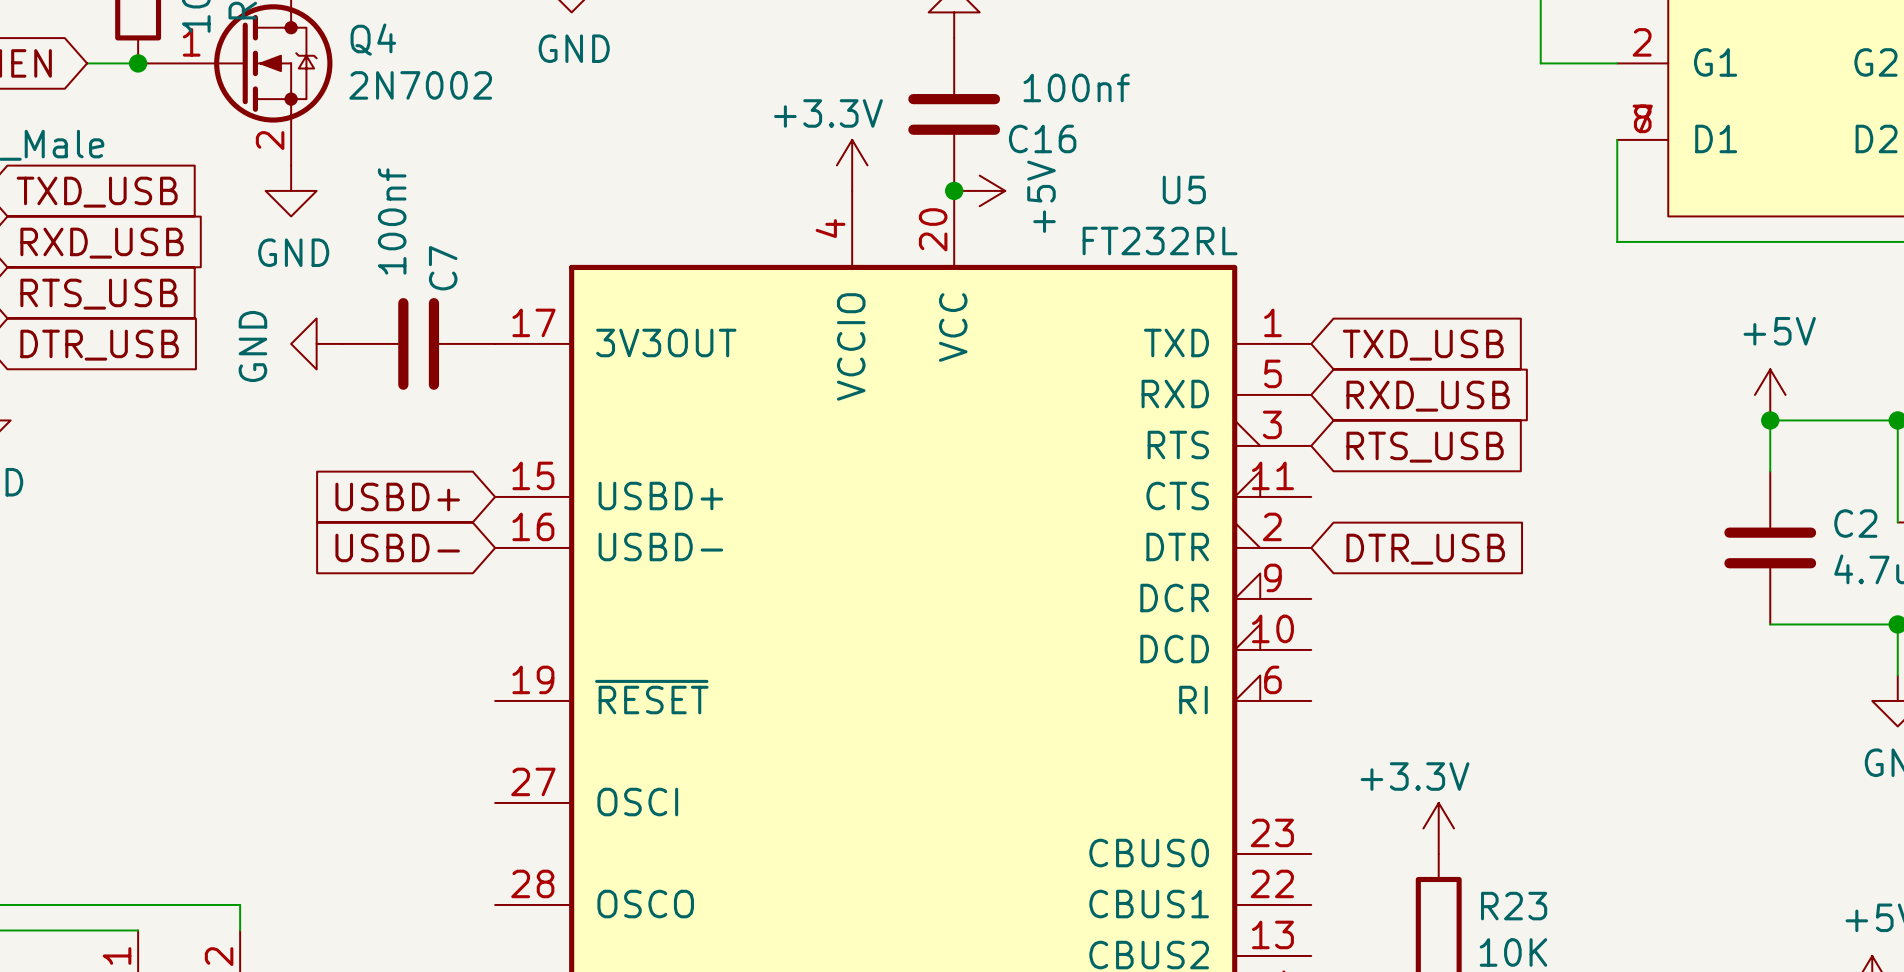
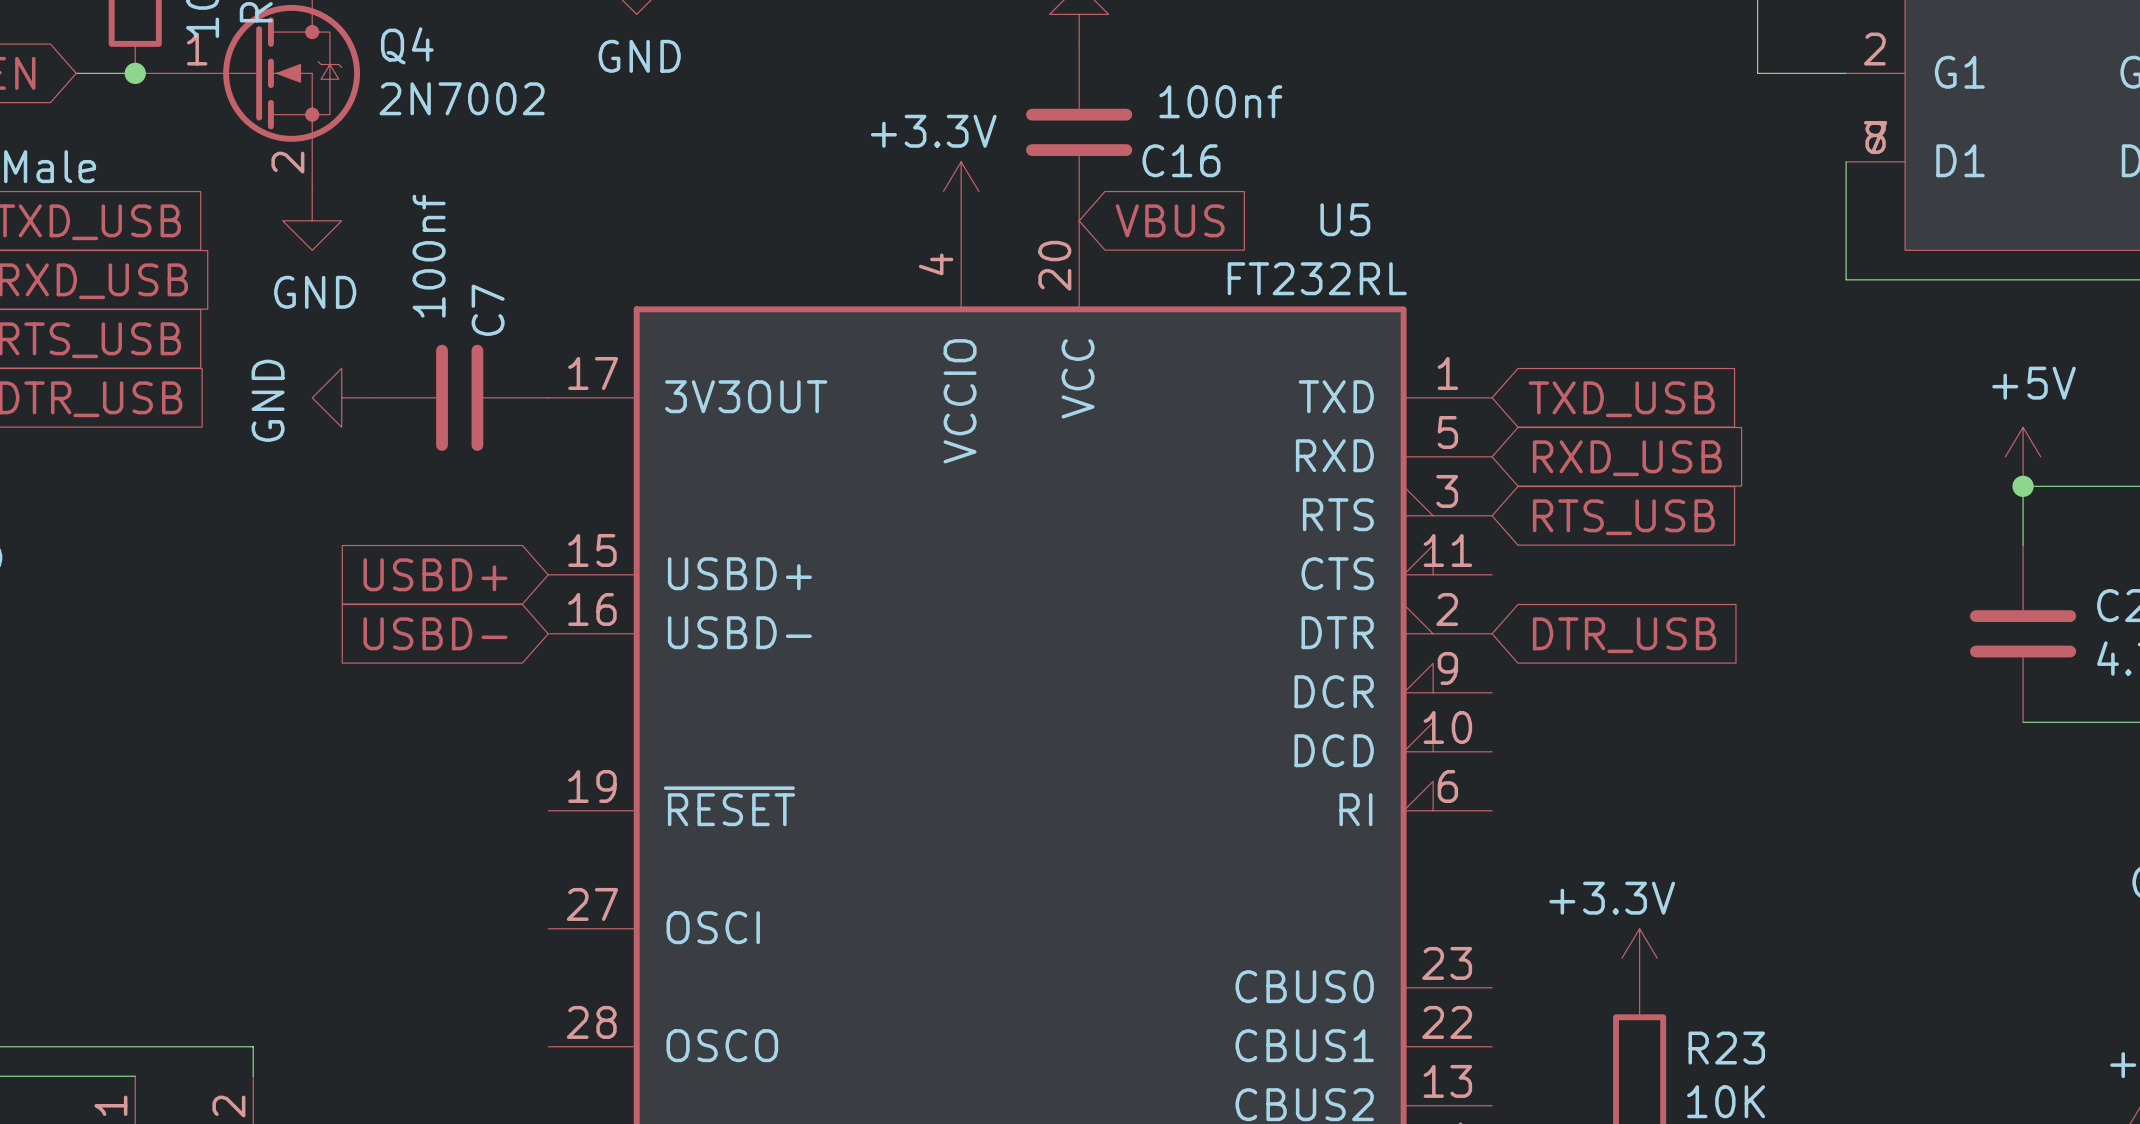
junction: (954, 190) -> none
power symbol: +5V (979, 190) -> none
global label: none -> VBUS (1170, 220)

